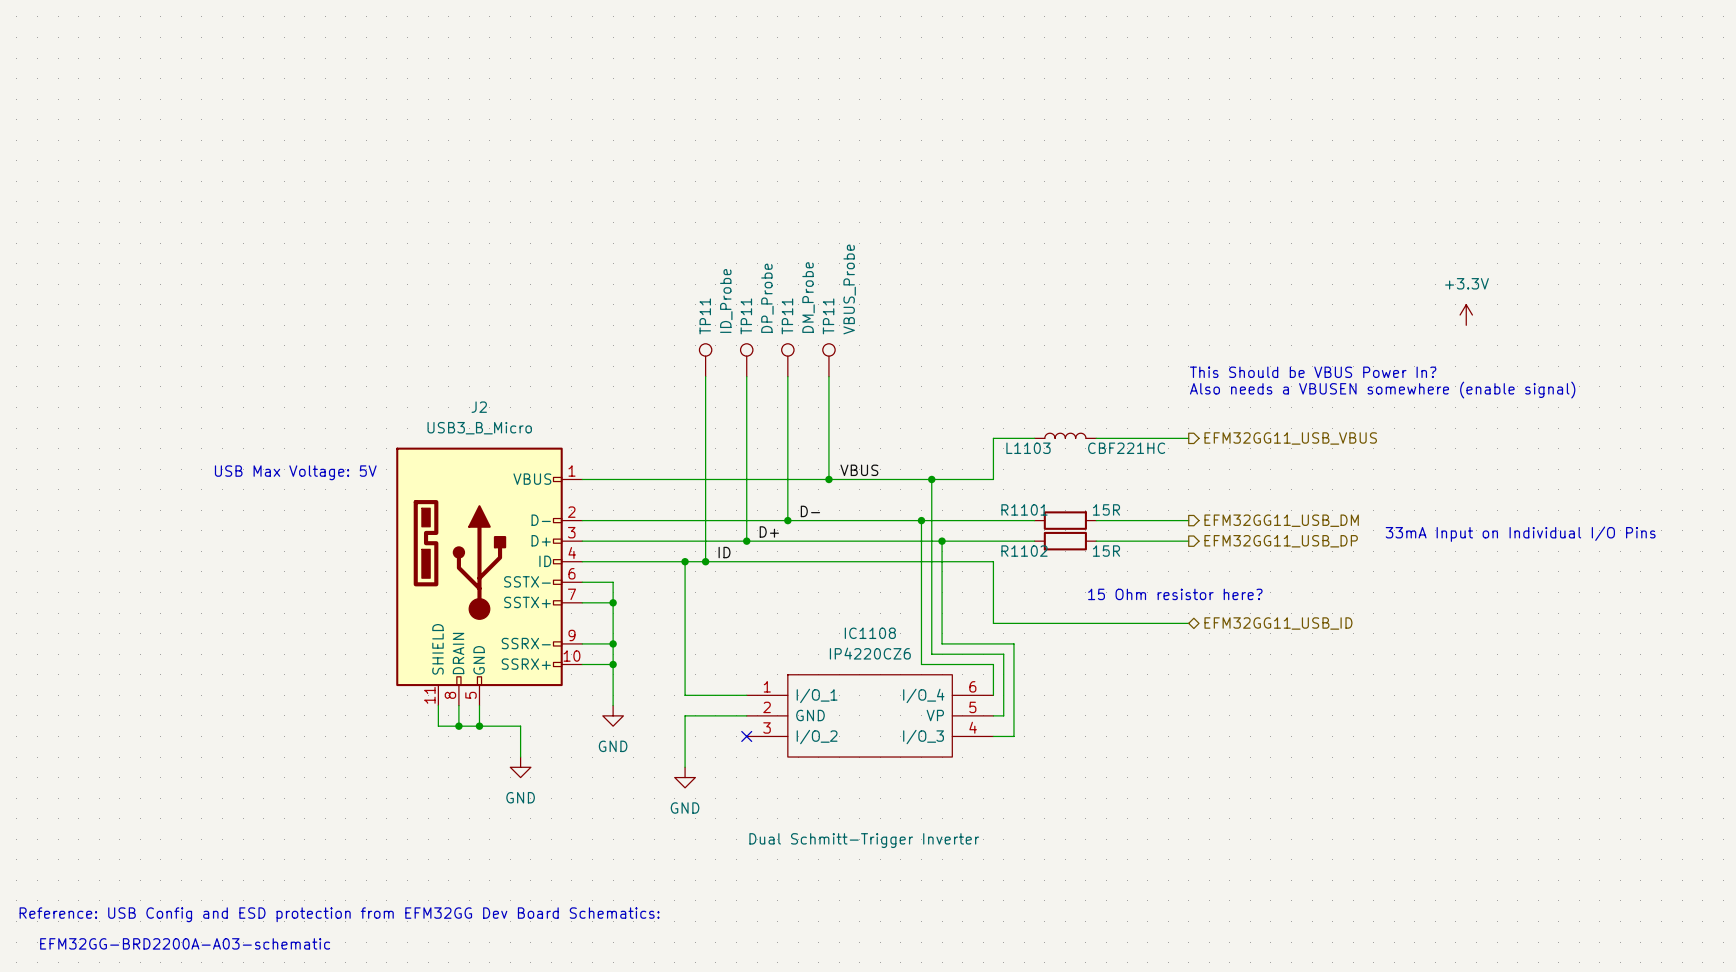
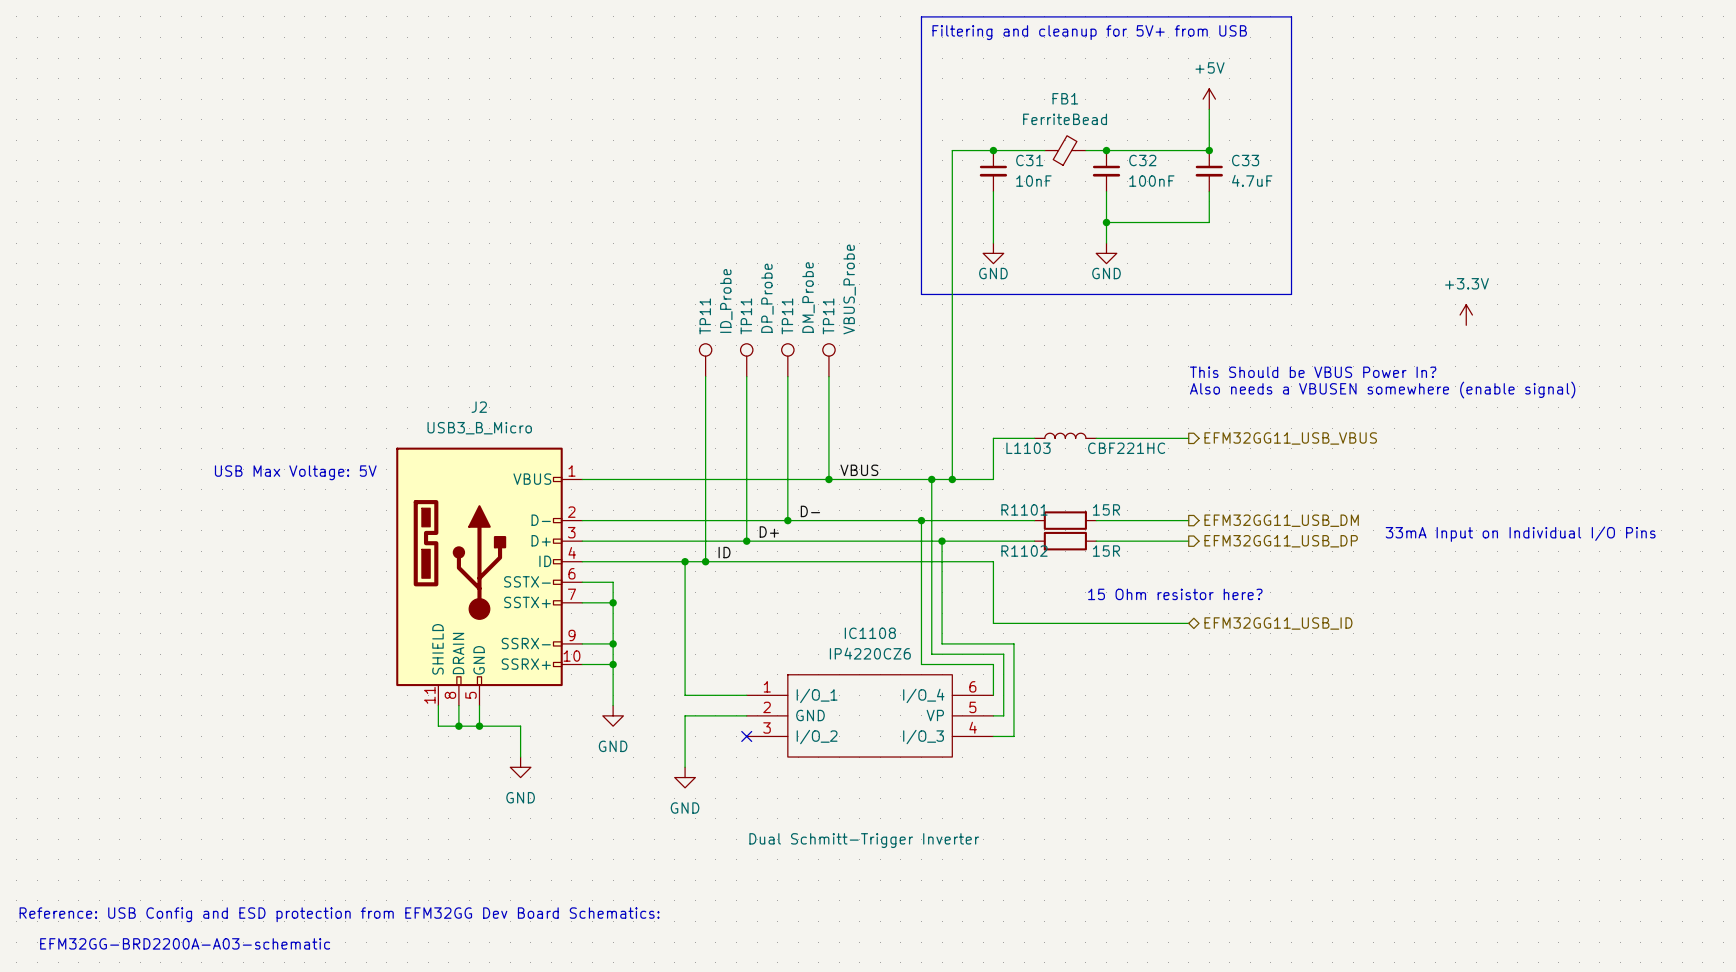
line: none -> (921, 16) (1291, 16) (1291, 294) (921, 294) (921, 16)
text: none -> Filtering and cleanup for 5V+ from USB (1089, 32)
power symbol: none -> +5V (1209, 99)
wire: none -> (1209, 109) (1209, 150) (1085, 150)
junction: none -> (993, 150)
wire: none -> (1044, 150) (952, 150) (952, 479)
FB1: none -> FerriteBead (1065, 150)
junction: none -> (1106, 150)
junction: none -> (1209, 150)
C31: none -> 10nF (993, 171)
C32: none -> 100nF (1106, 171)
C33: none -> 4.7uF (1209, 171)
wire: none -> (993, 191) (993, 243)
wire: none -> (1106, 191) (1106, 243)
wire: none -> (1209, 191) (1209, 222) (1106, 222)
junction: none -> (1106, 222)
power symbol: none -> GND (993, 253)
power symbol: none -> GND (1106, 253)
junction: none -> (952, 479)

